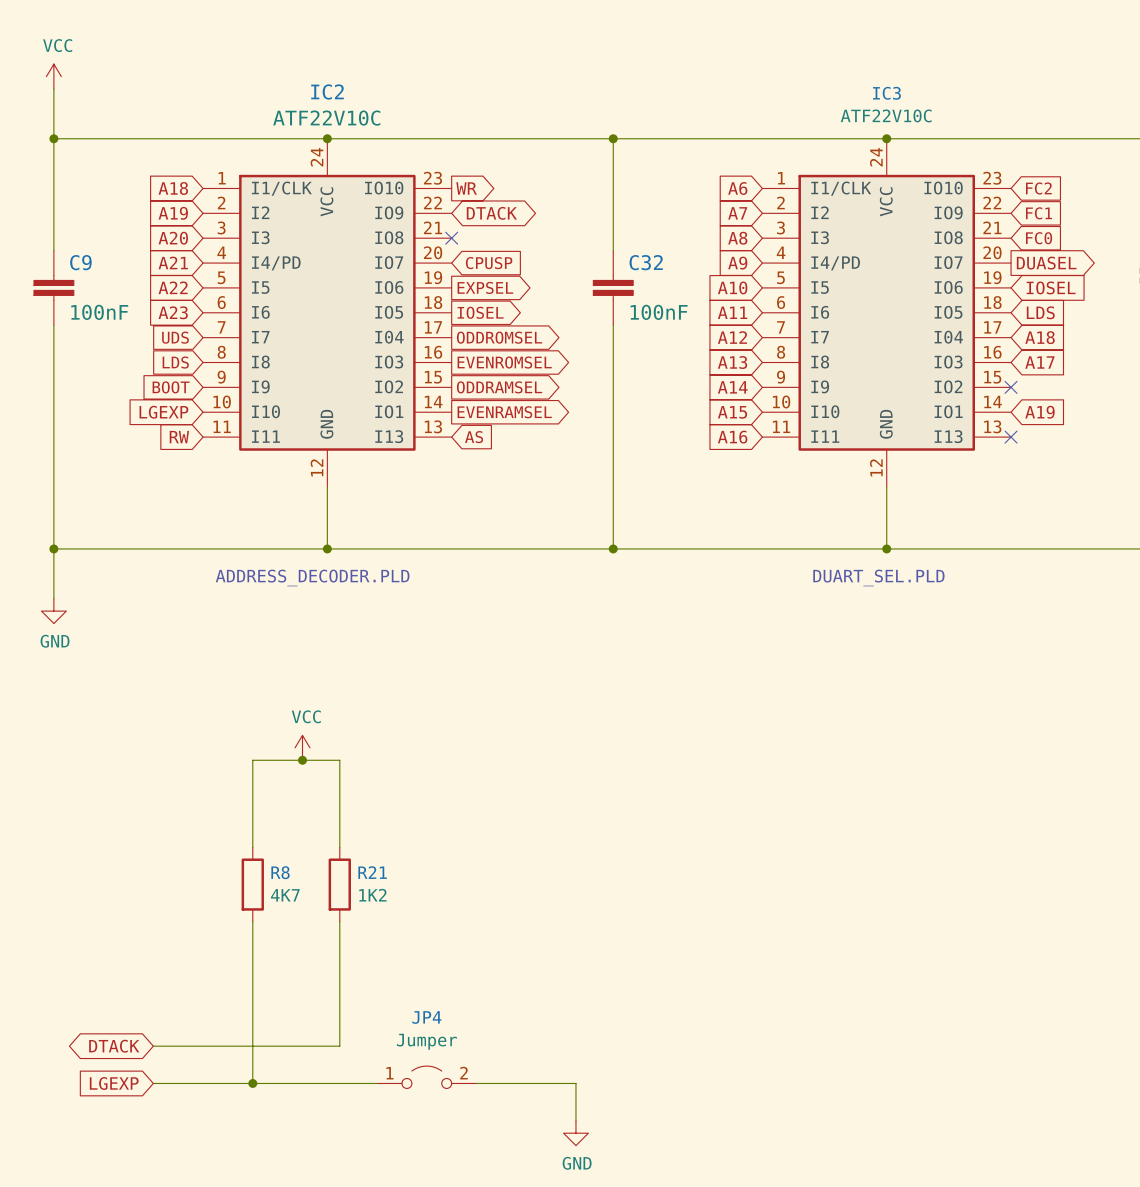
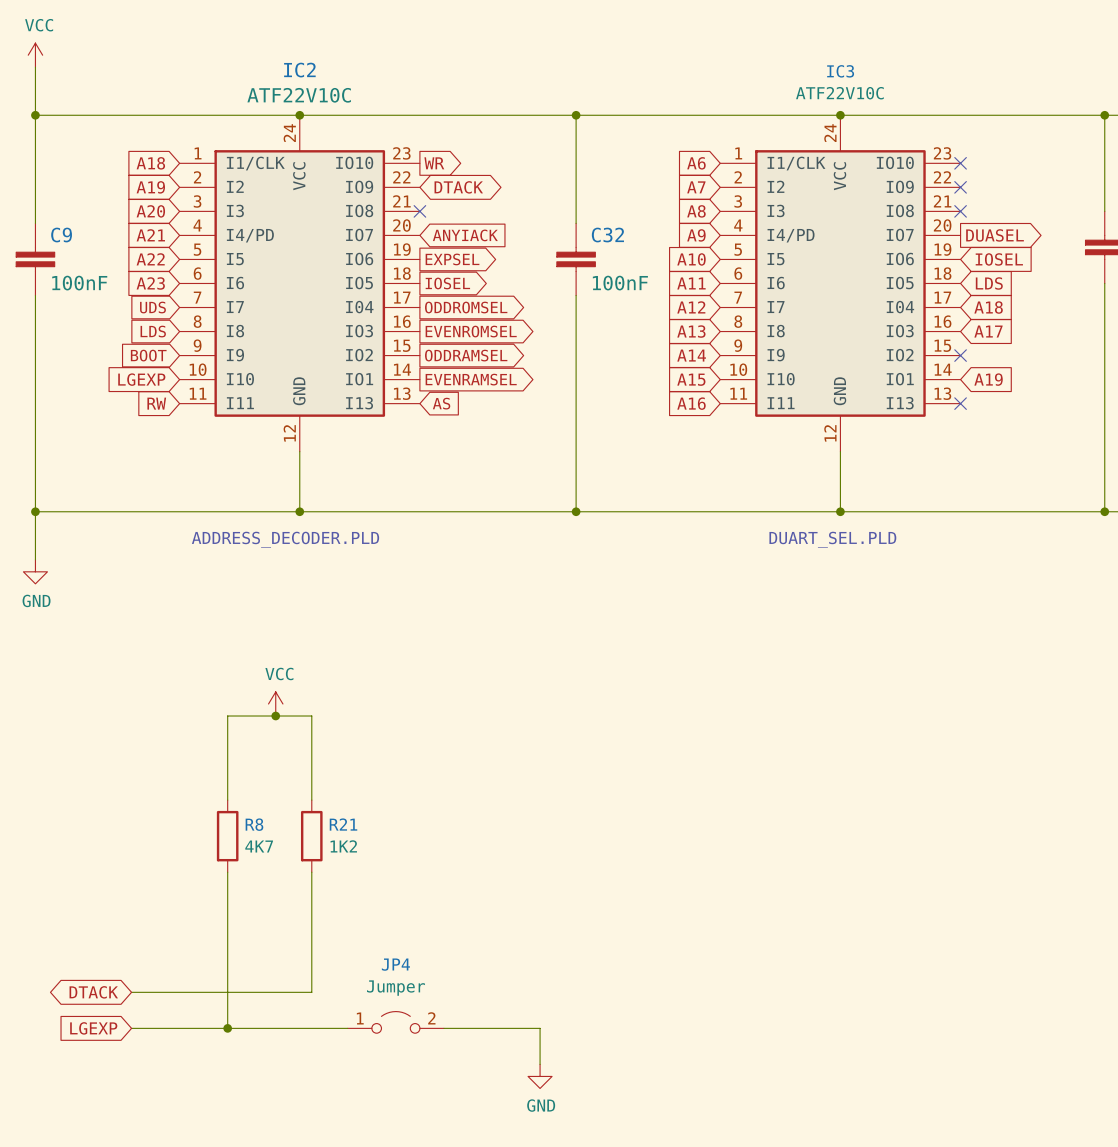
no-connect mark: none -> (960, 163)
global label: FC2 (1038, 188) -> none
no-connect mark: none -> (960, 187)
global label: FC1 (1039, 213) -> none
no-connect mark: none -> (960, 211)
global label: FC0 (1039, 238) -> none
global label: CPUSP (489, 263) -> ANYIACK (465, 235)

